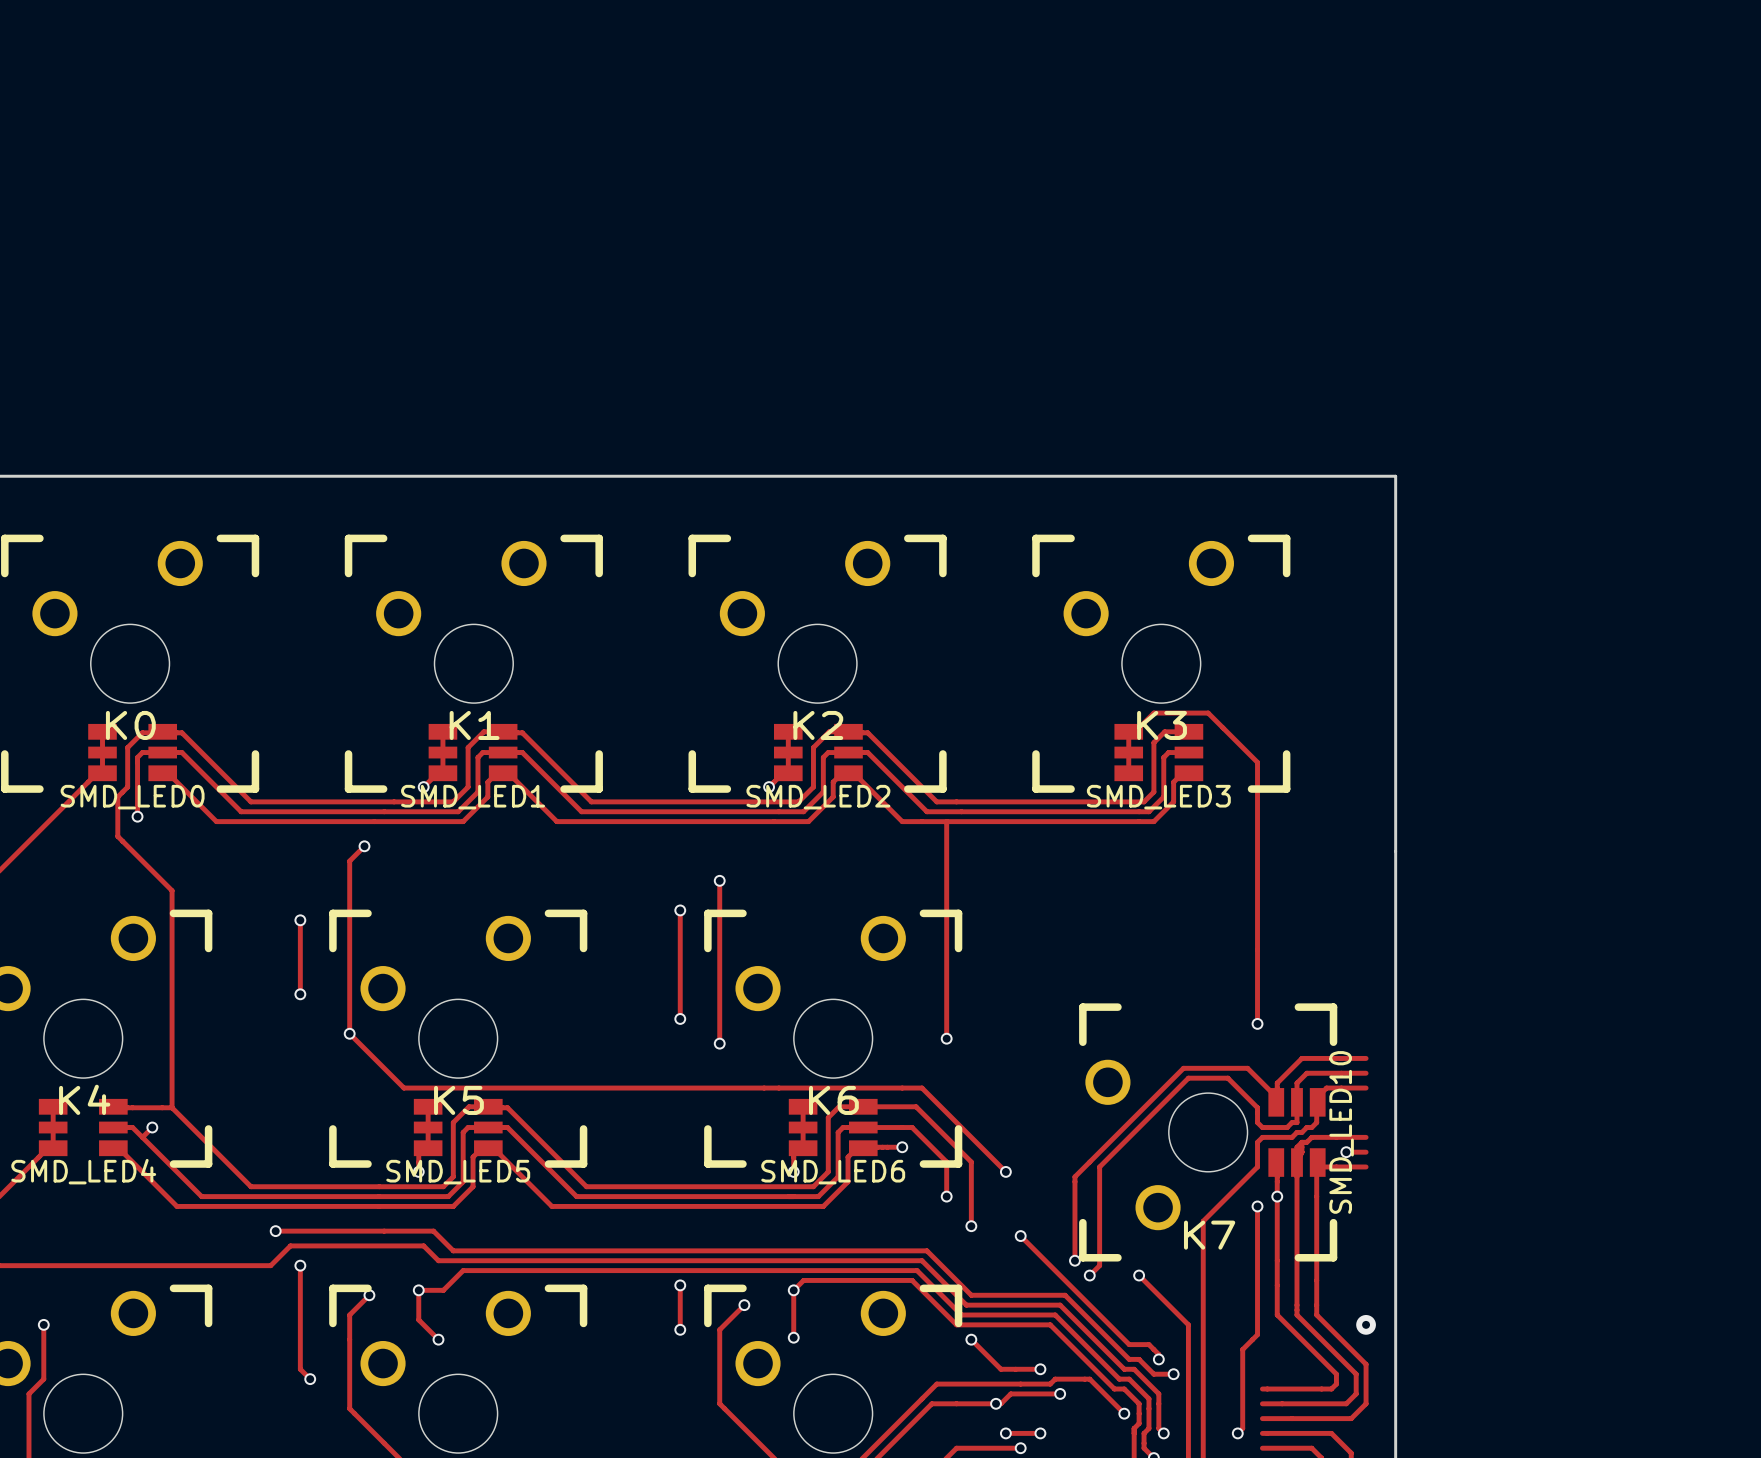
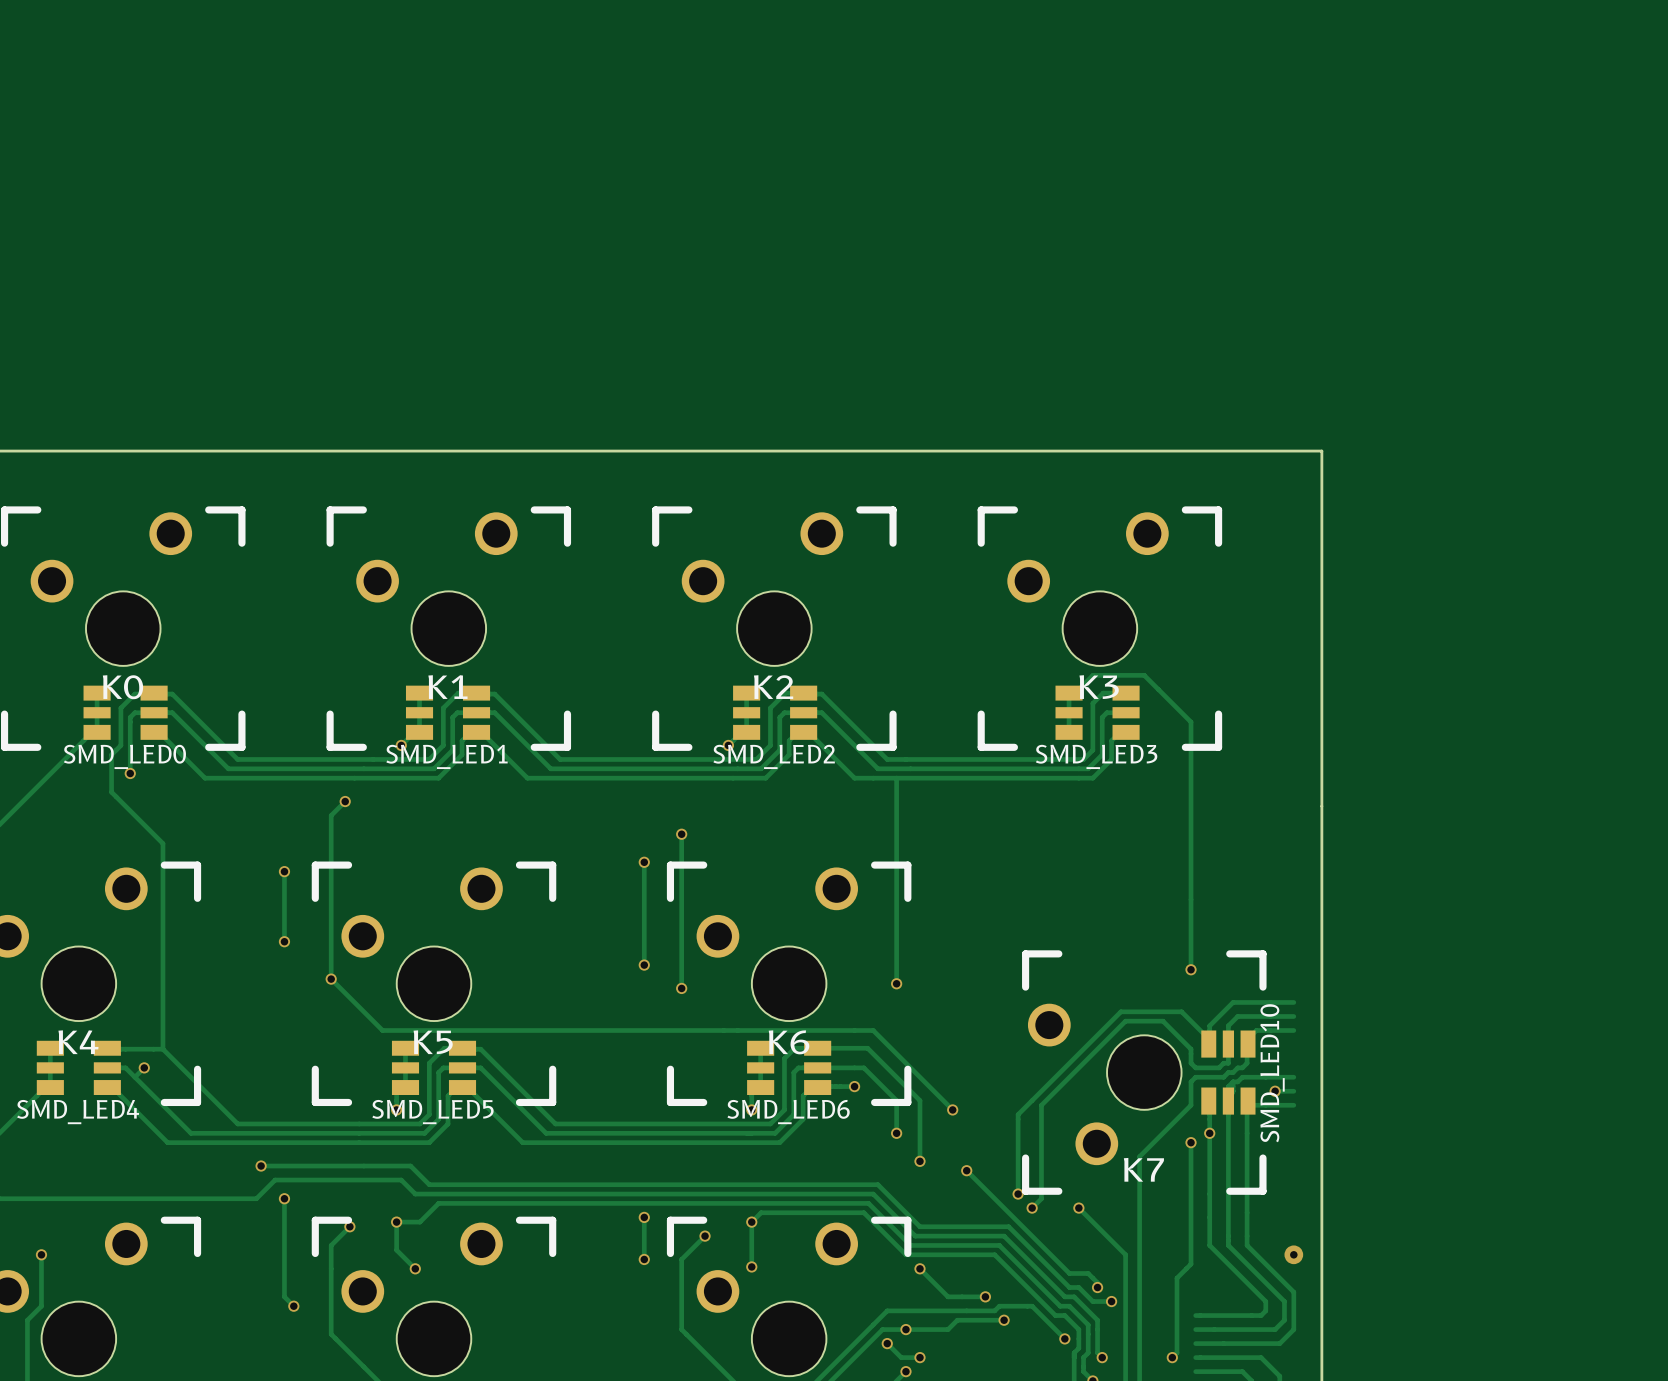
via: none -> (905, 1329)
via: (996, 1403) -> none
track: none -> (887, 1343) (901, 1357) (919, 1357)
via: none -> (887, 1343)
via: none -> (919, 1357)
track: (1005, 1433) (1040, 1433) -> none
via: (1005, 1433) -> none
via: (1040, 1433) -> none
track: (956, 1448) (1020, 1448) -> none
via: none -> (905, 1371)
via: (1020, 1448) -> none

